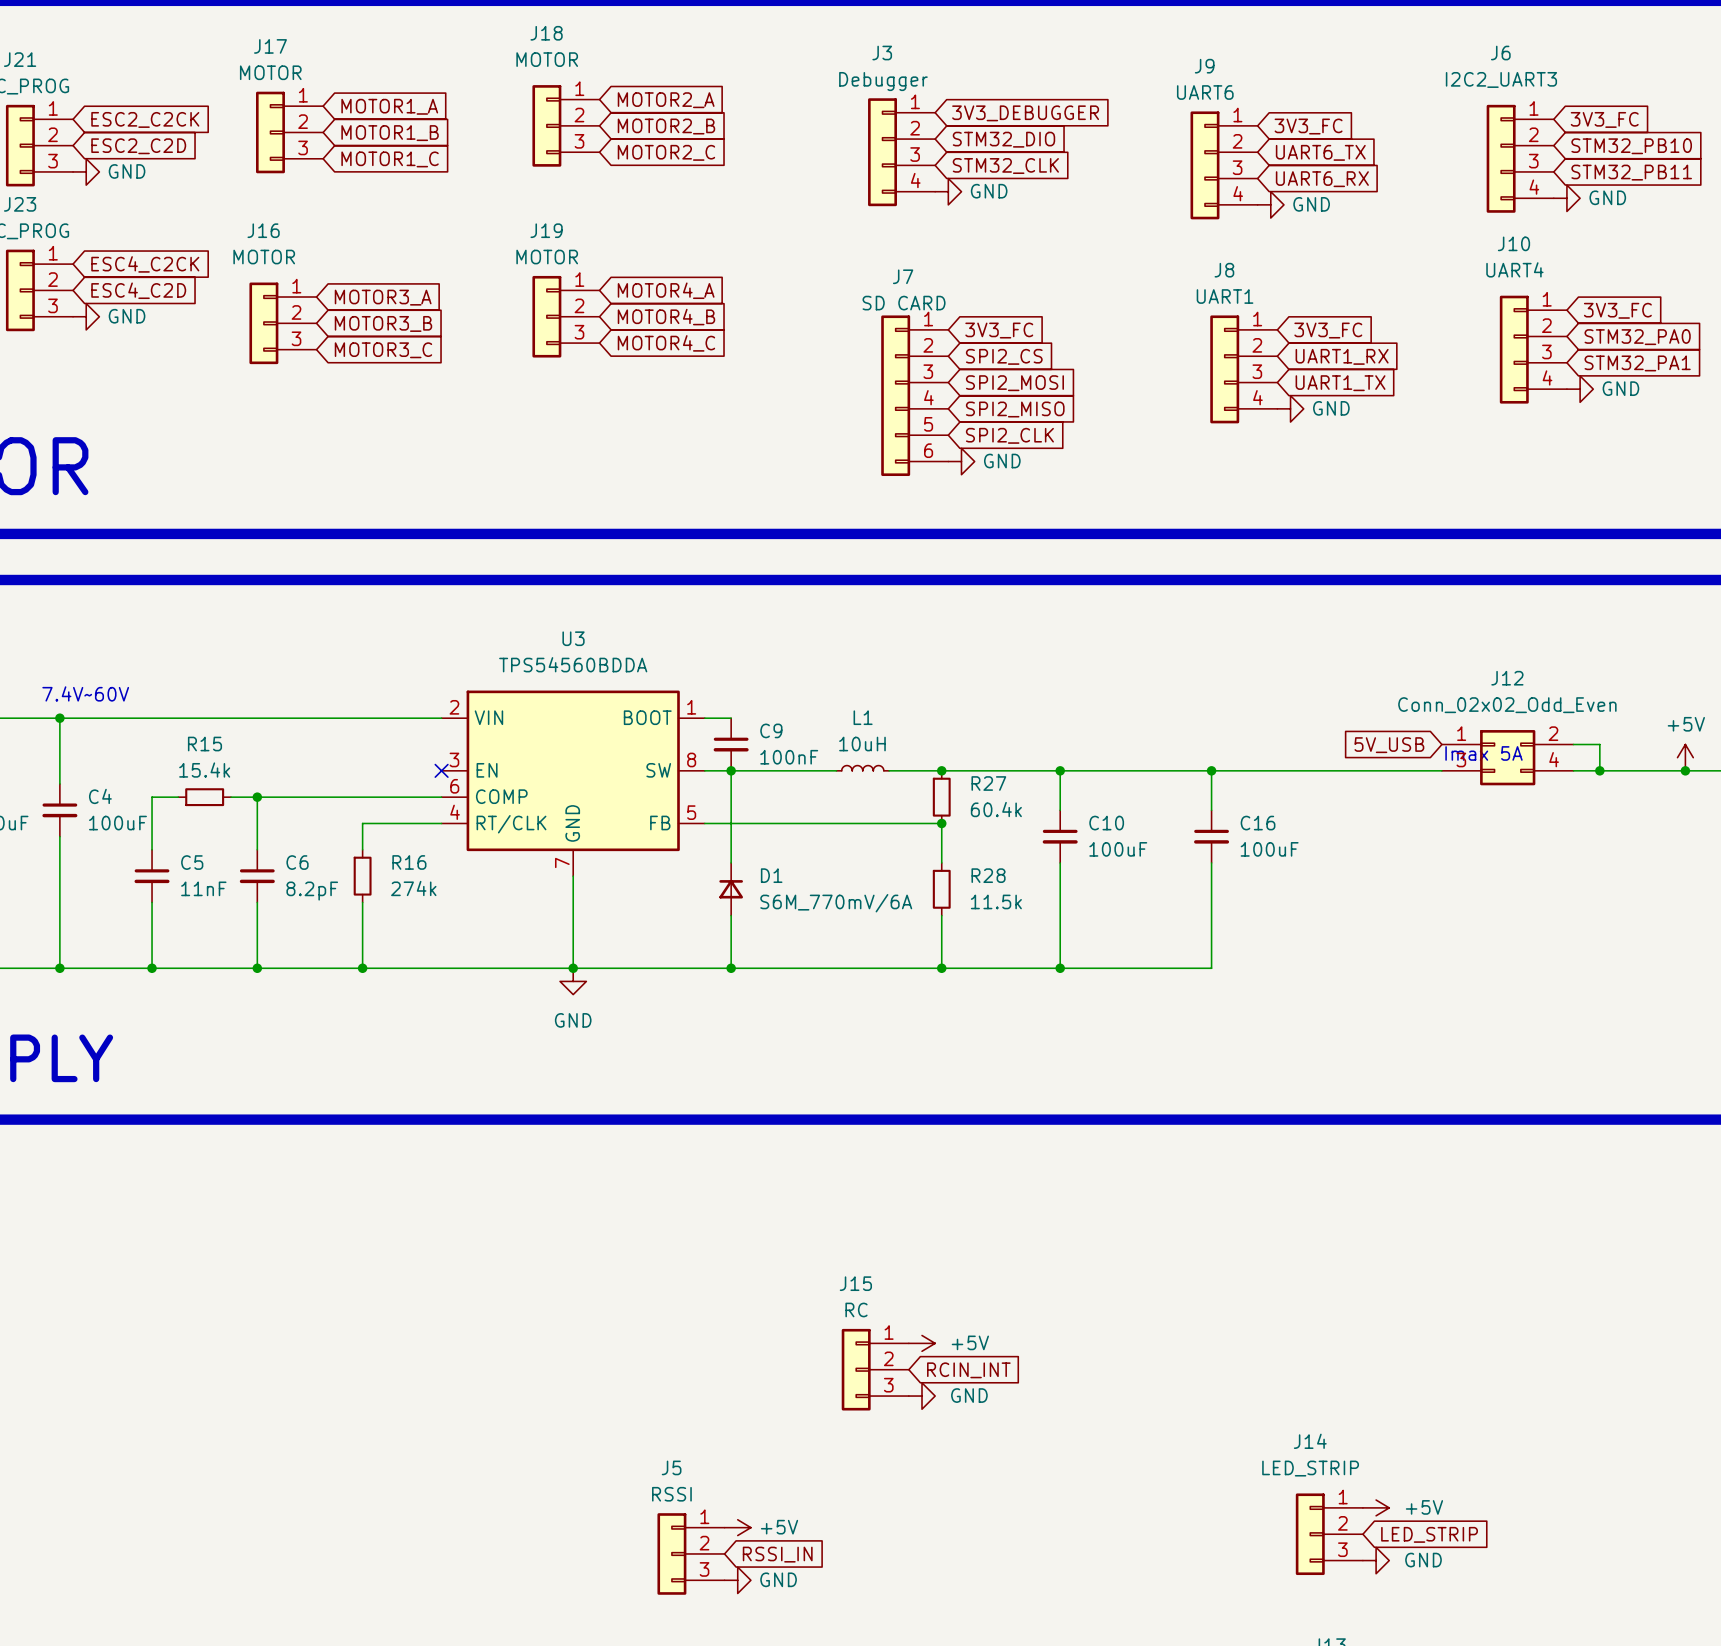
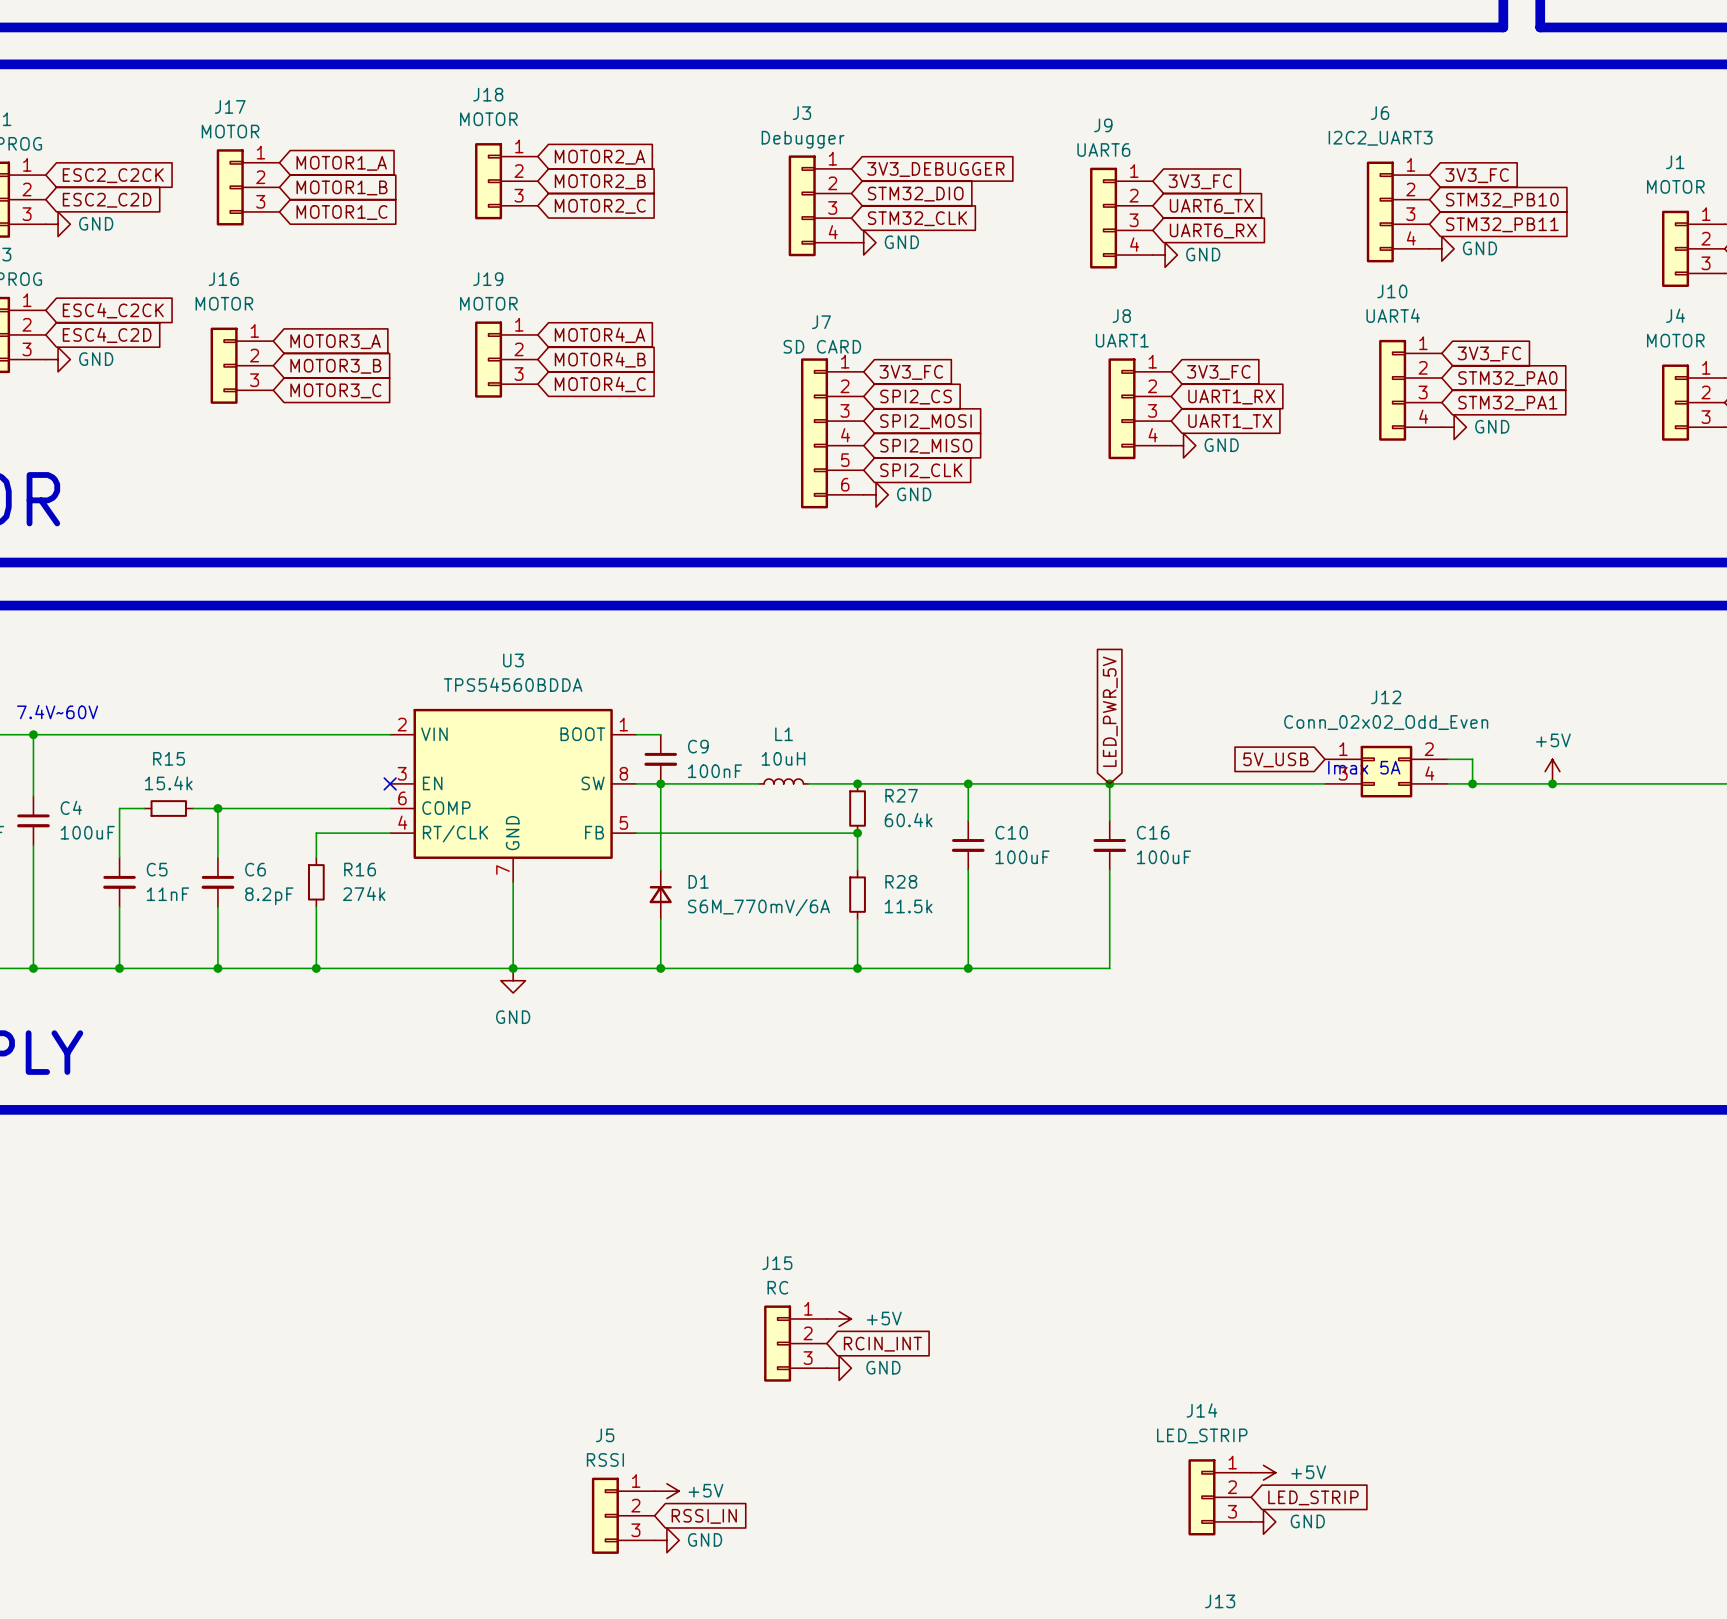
global label: none -> LED_PWR_5V (1110, 711)

